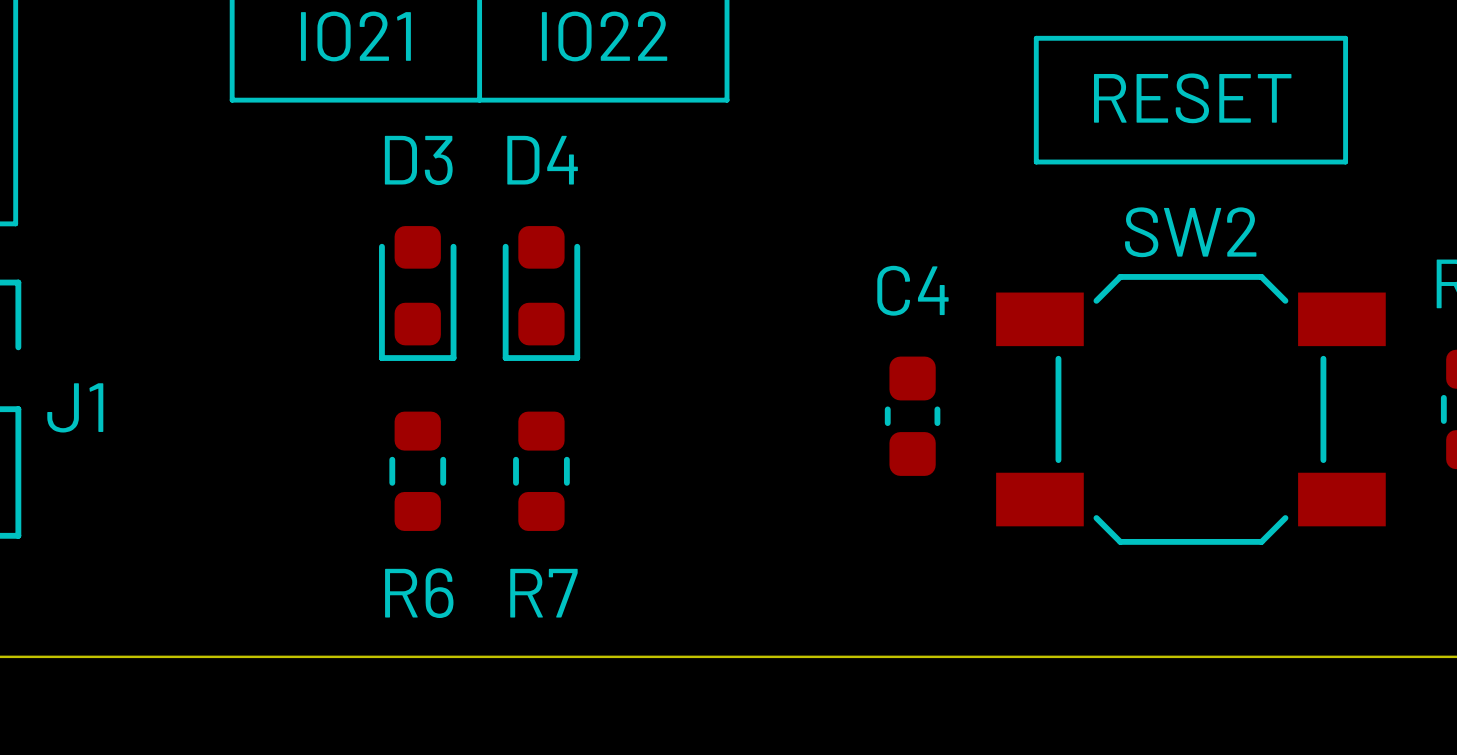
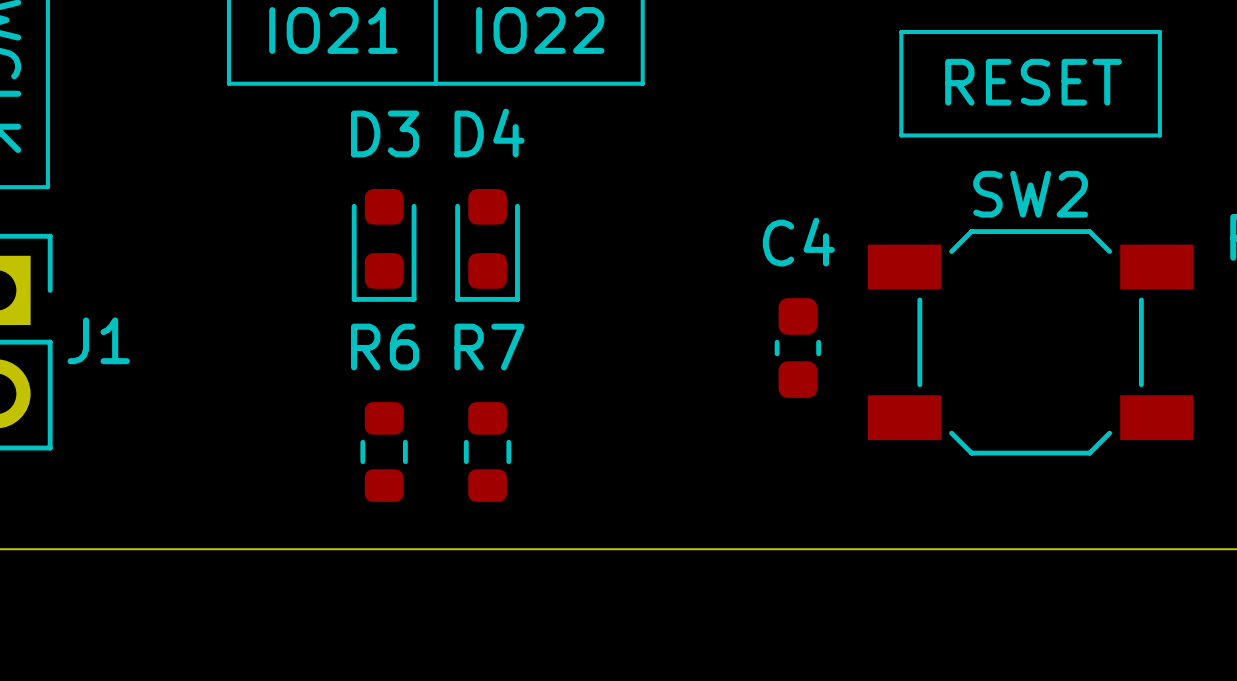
R6 position: (417, 471) -> (384, 451)
R7 position: (541, 471) -> (487, 451)
R6 name position: R6 (419, 593) -> R6 (385, 347)
R7 name position: R7 (543, 593) -> R7 (489, 347)

